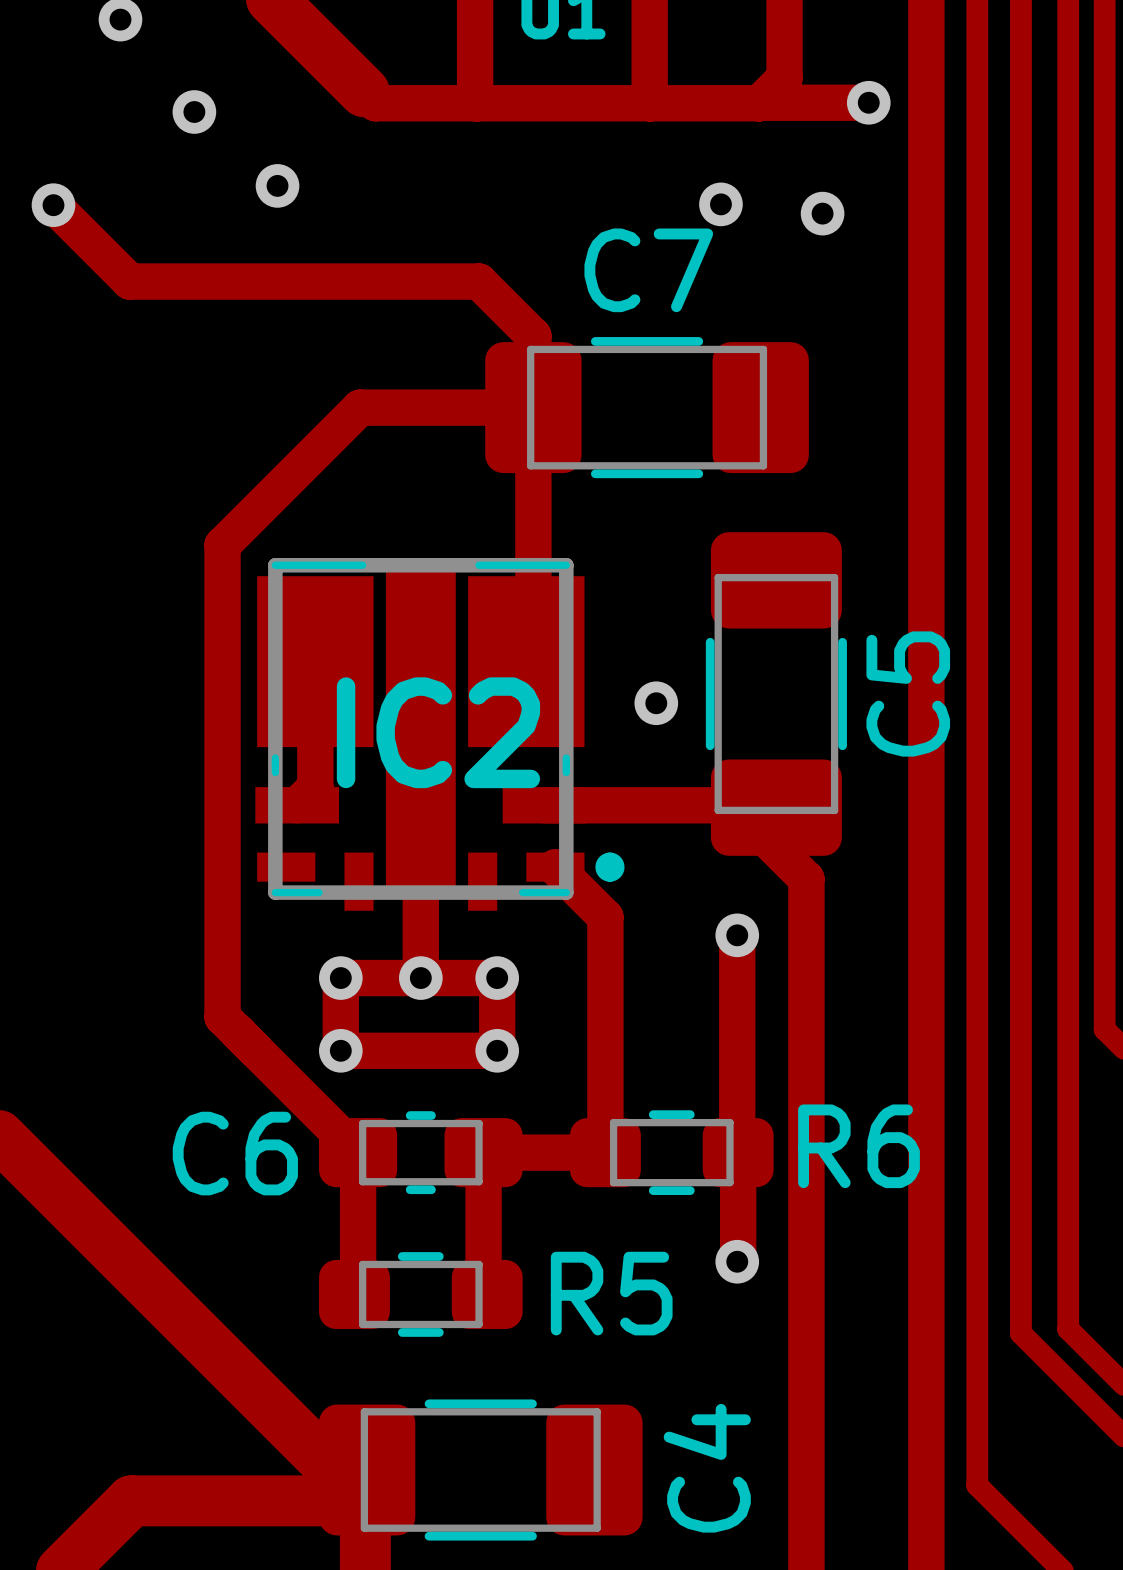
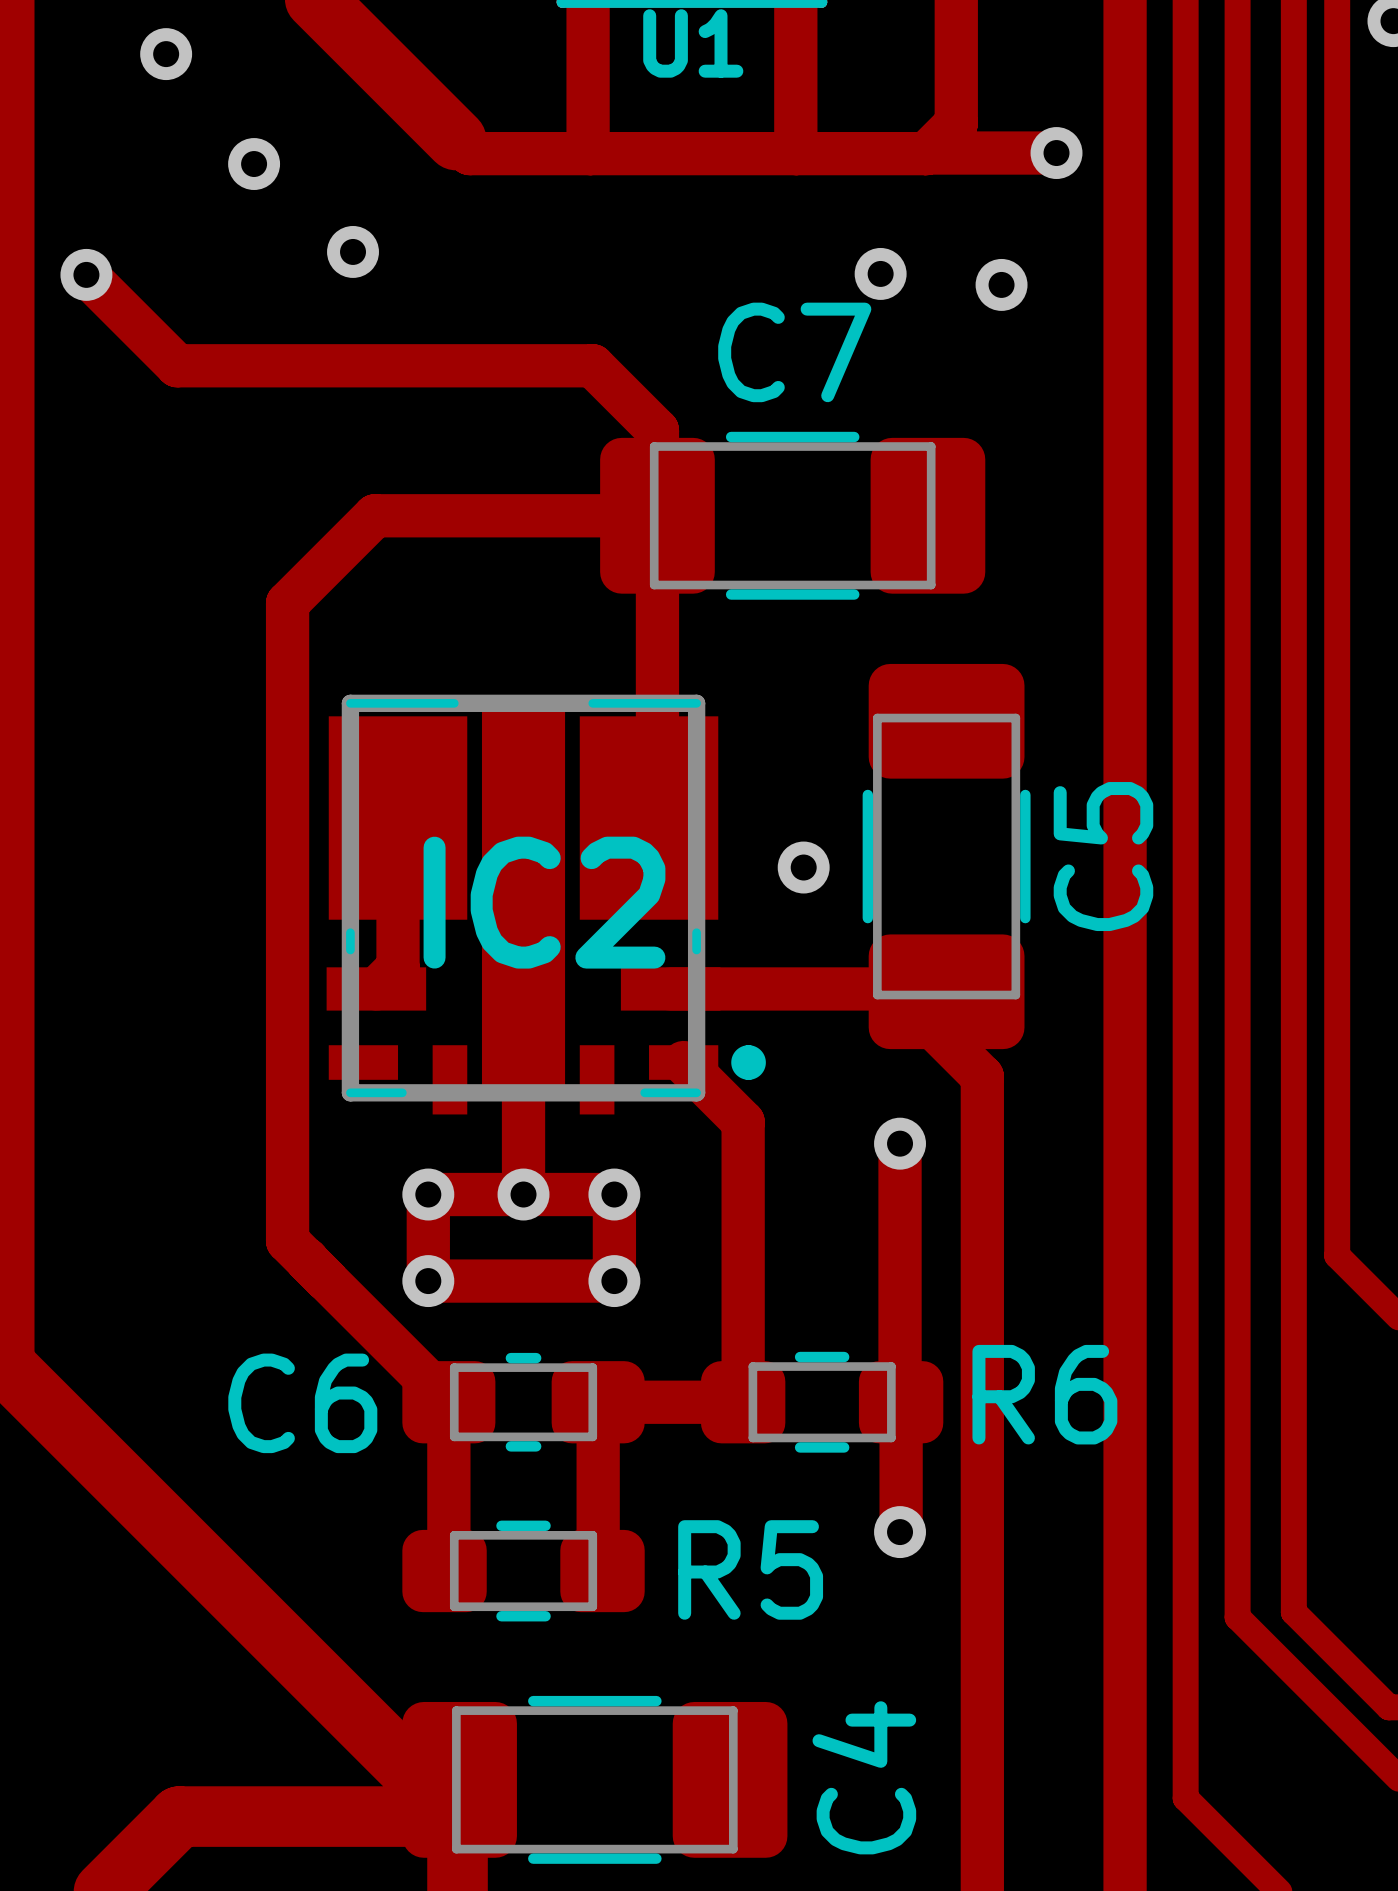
track: (360, 407) (222, 545) -> (451, 515) (375, 515) (287, 603) (287, 679)

